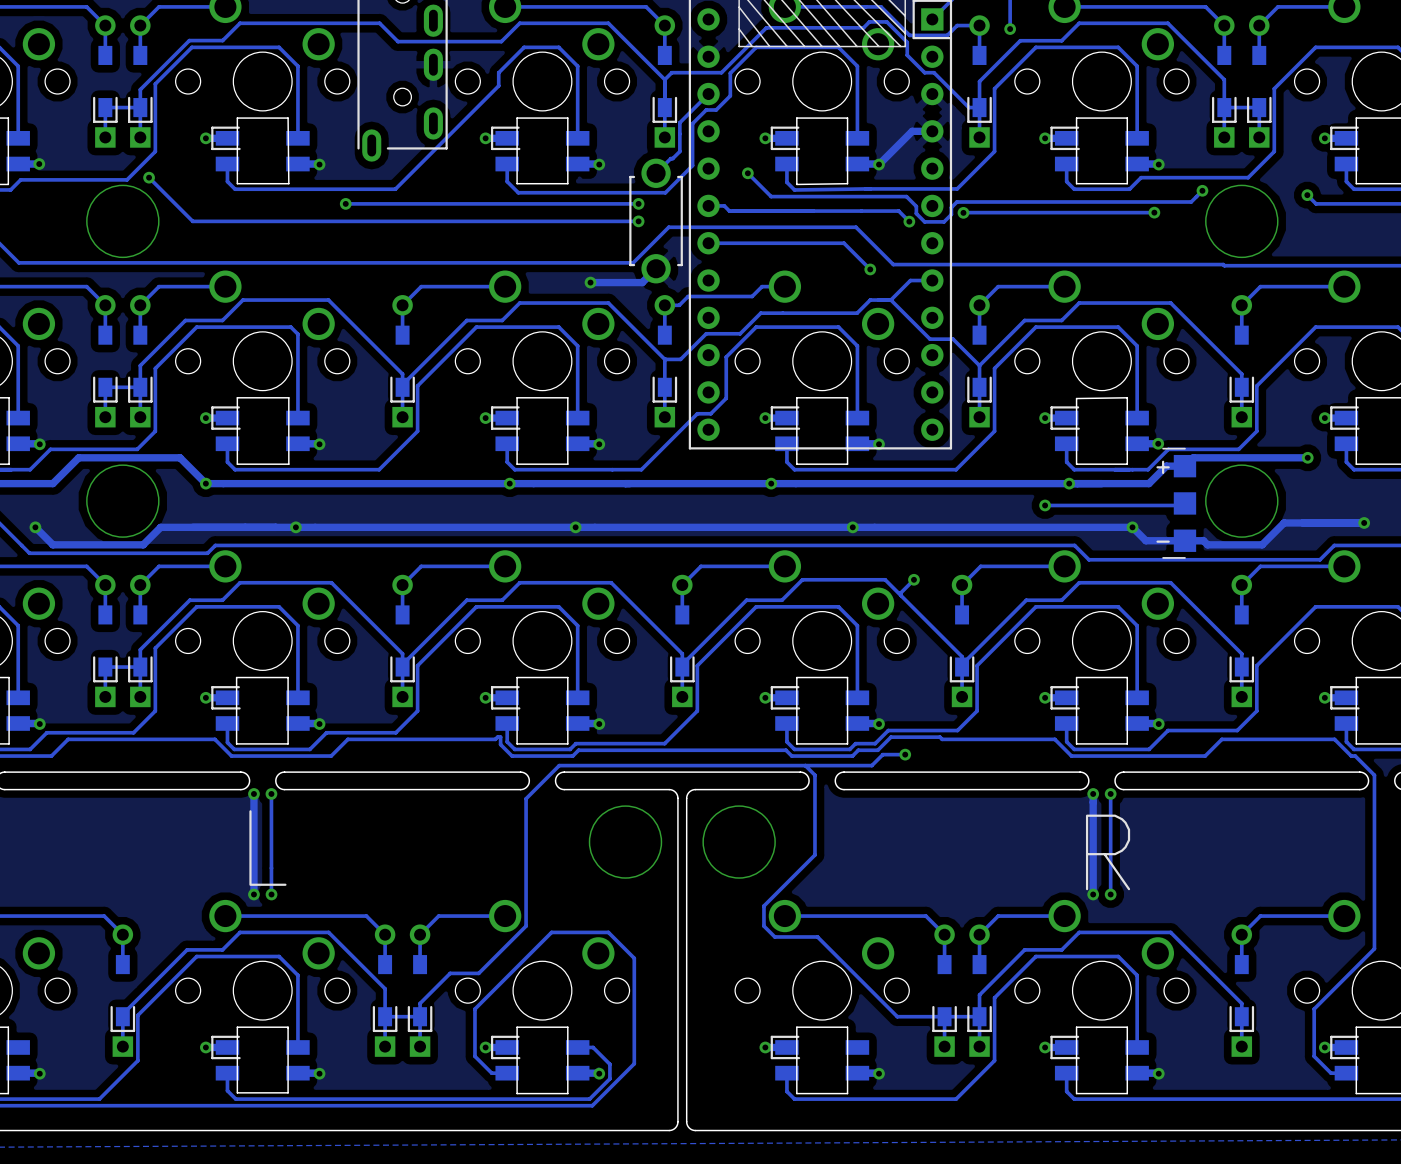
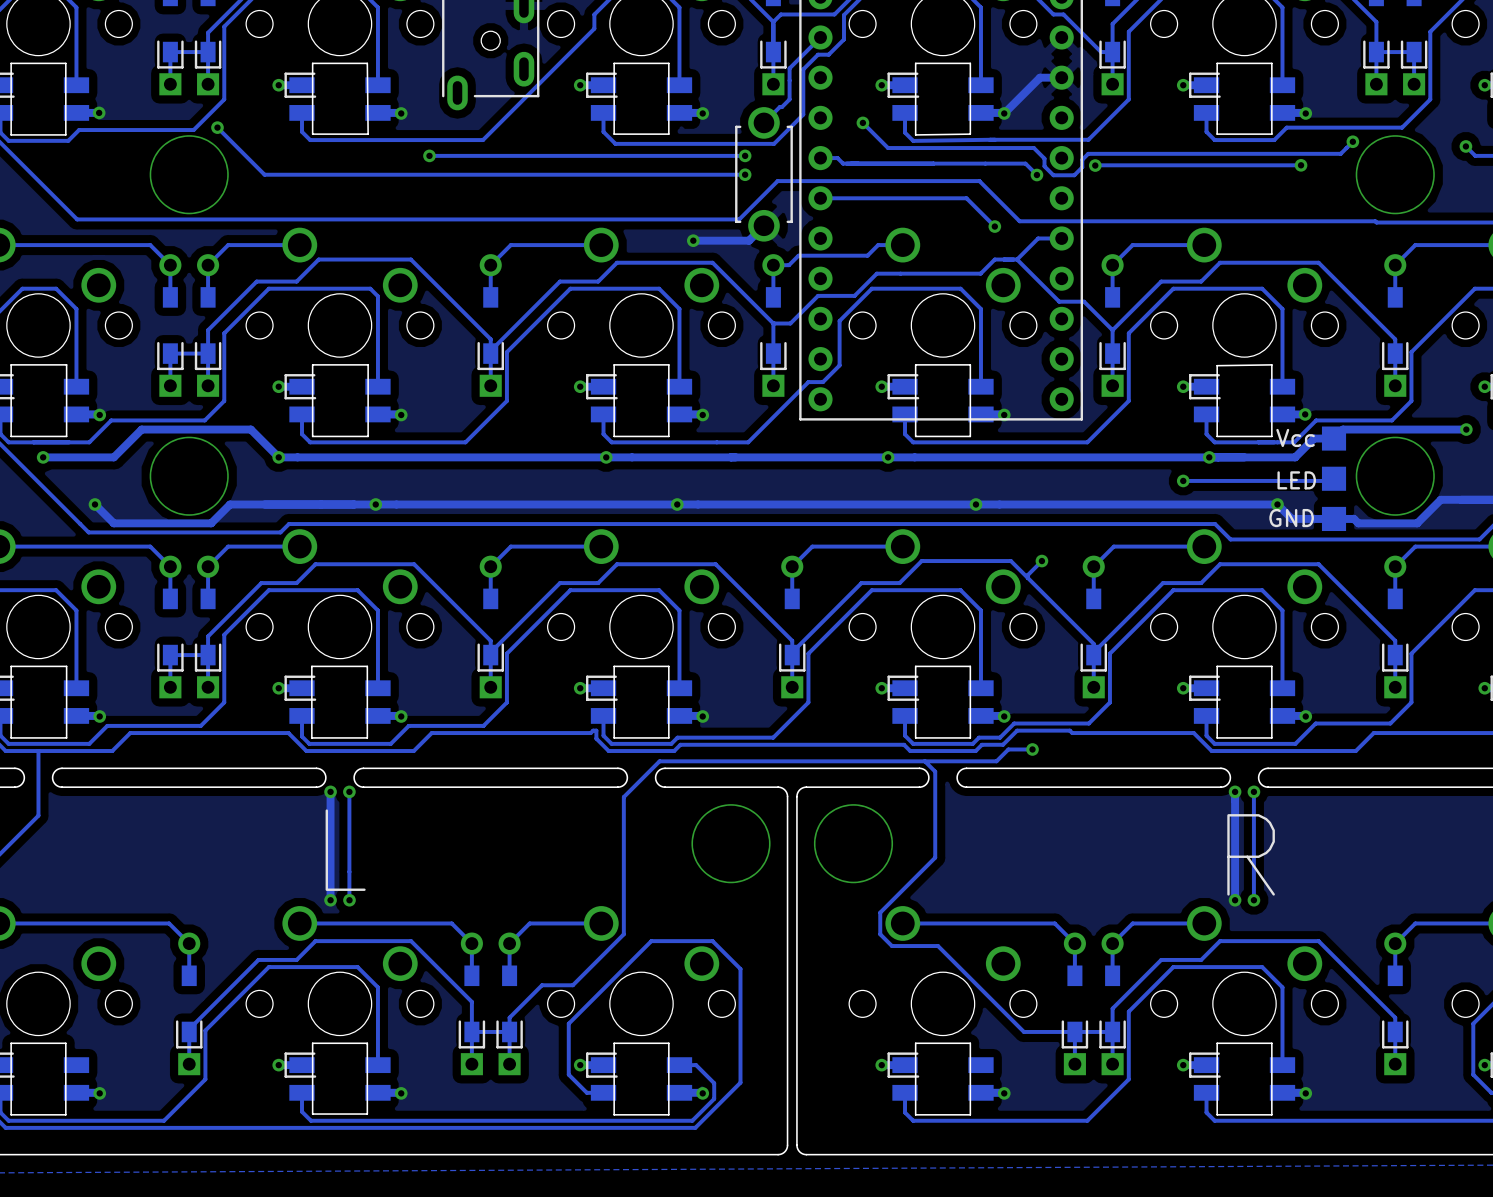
line: (1184, 448) (1163, 448) -> none
text: + (1163, 467) -> Vcc (1295, 437)
text: none -> LED (1296, 480)
text: none -> GND (1291, 518)
text: - (1163, 541) -> none
line: (1184, 557) (1163, 557) -> none

